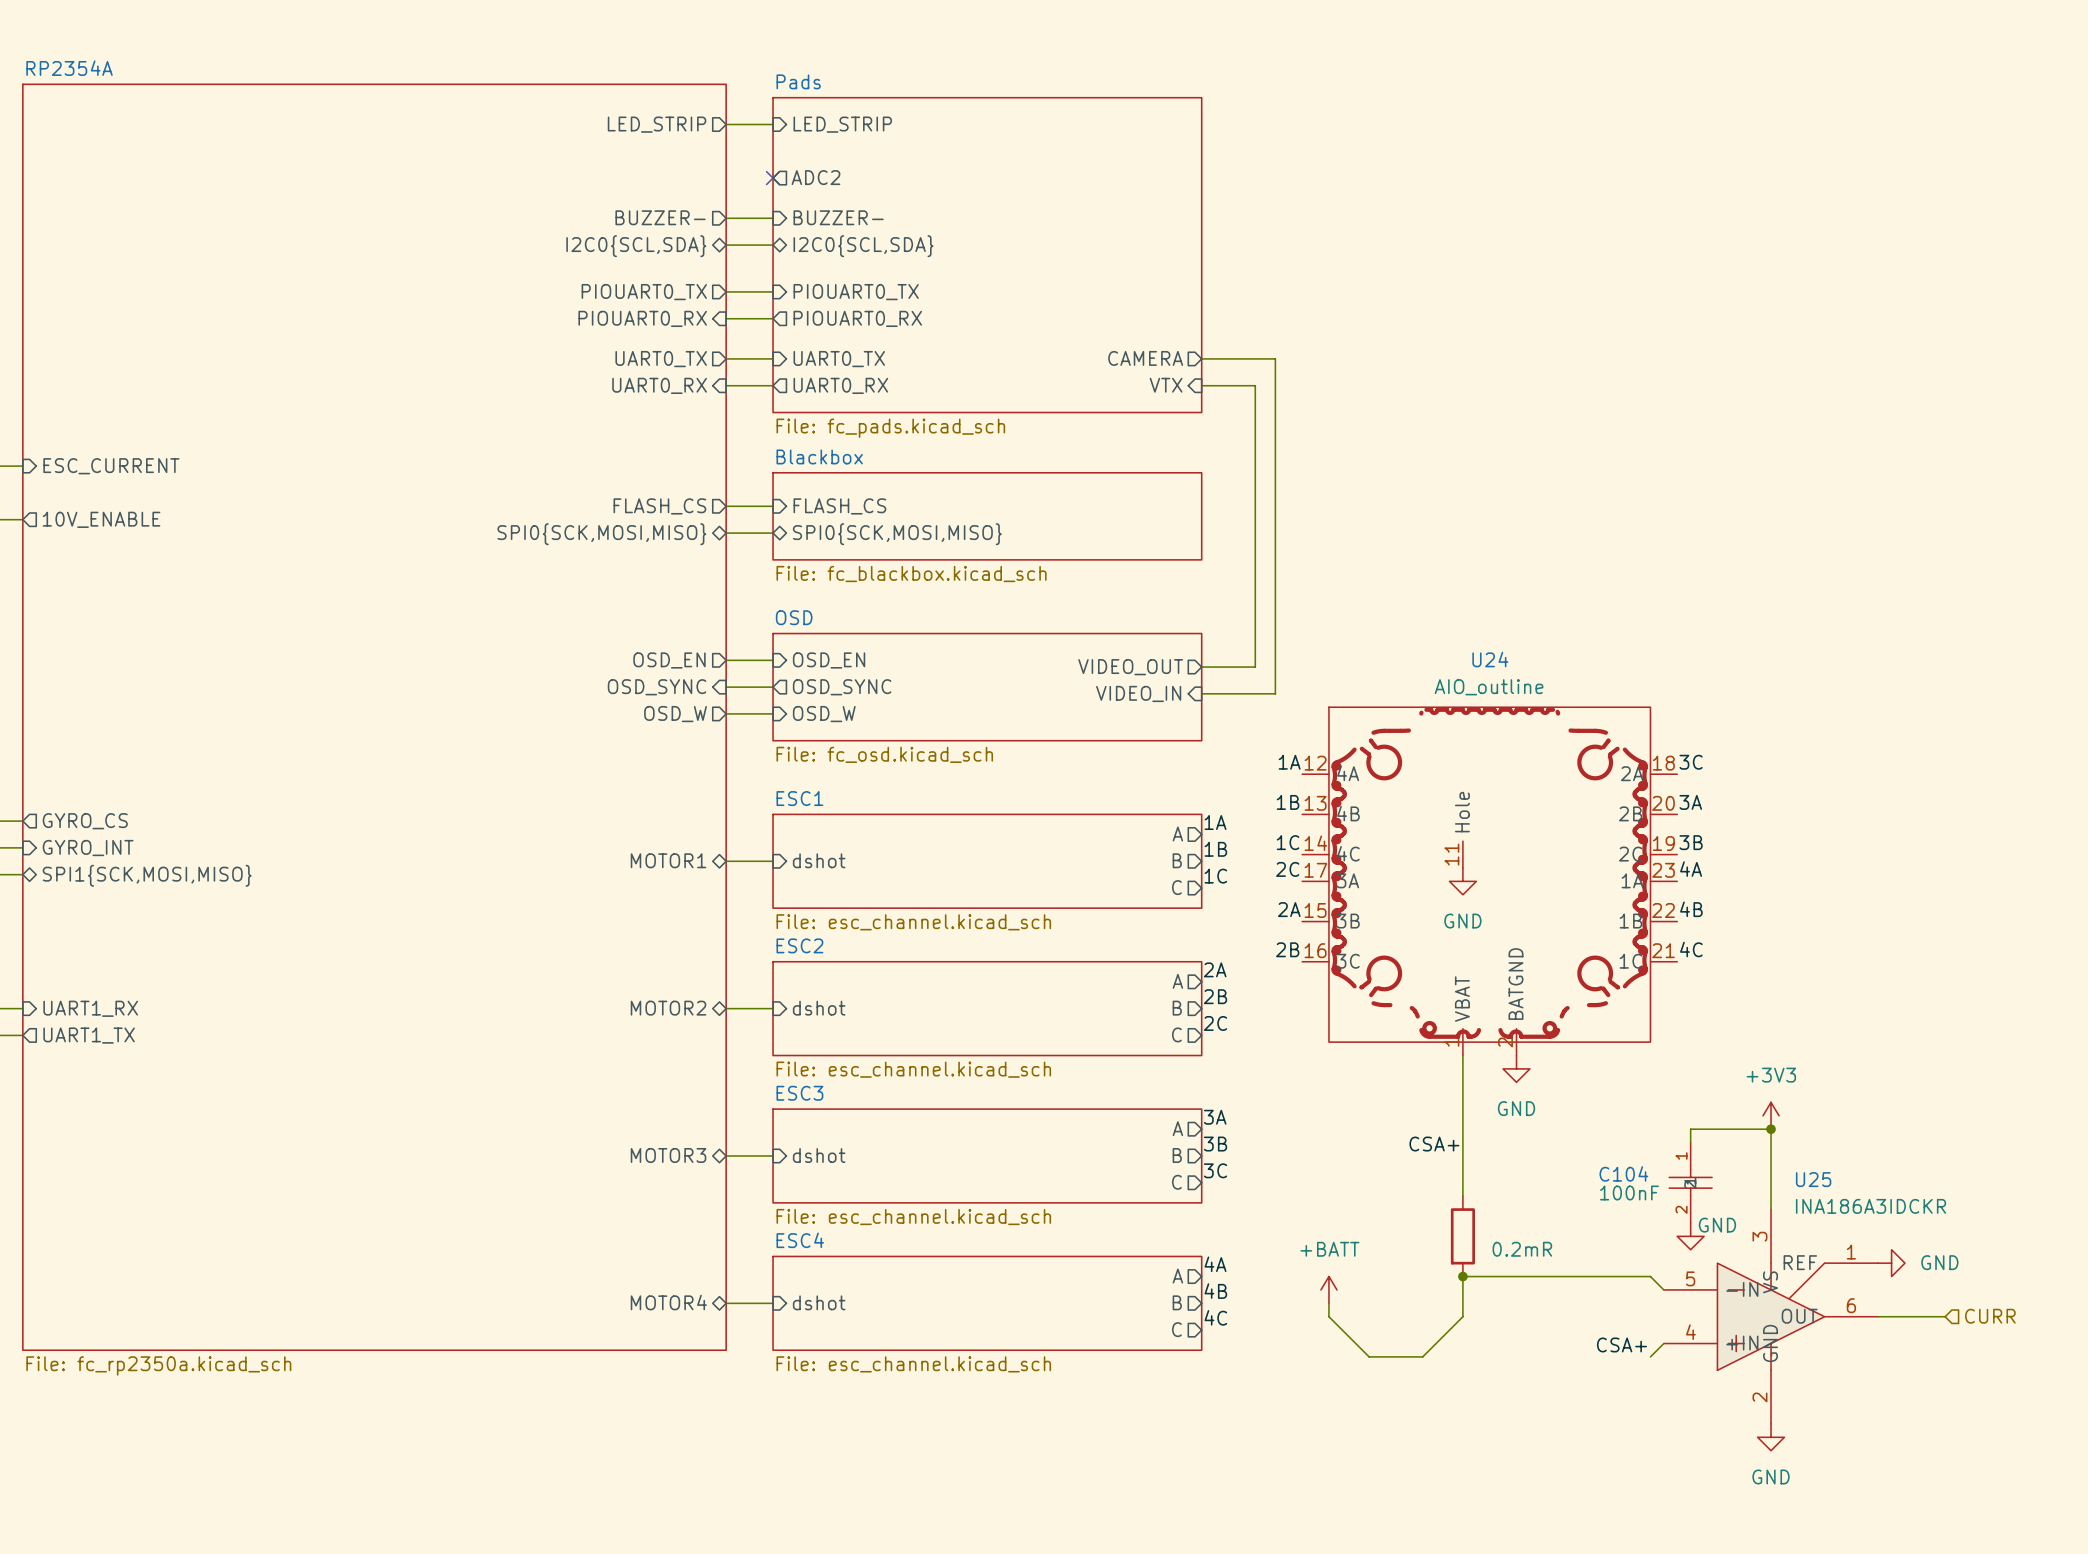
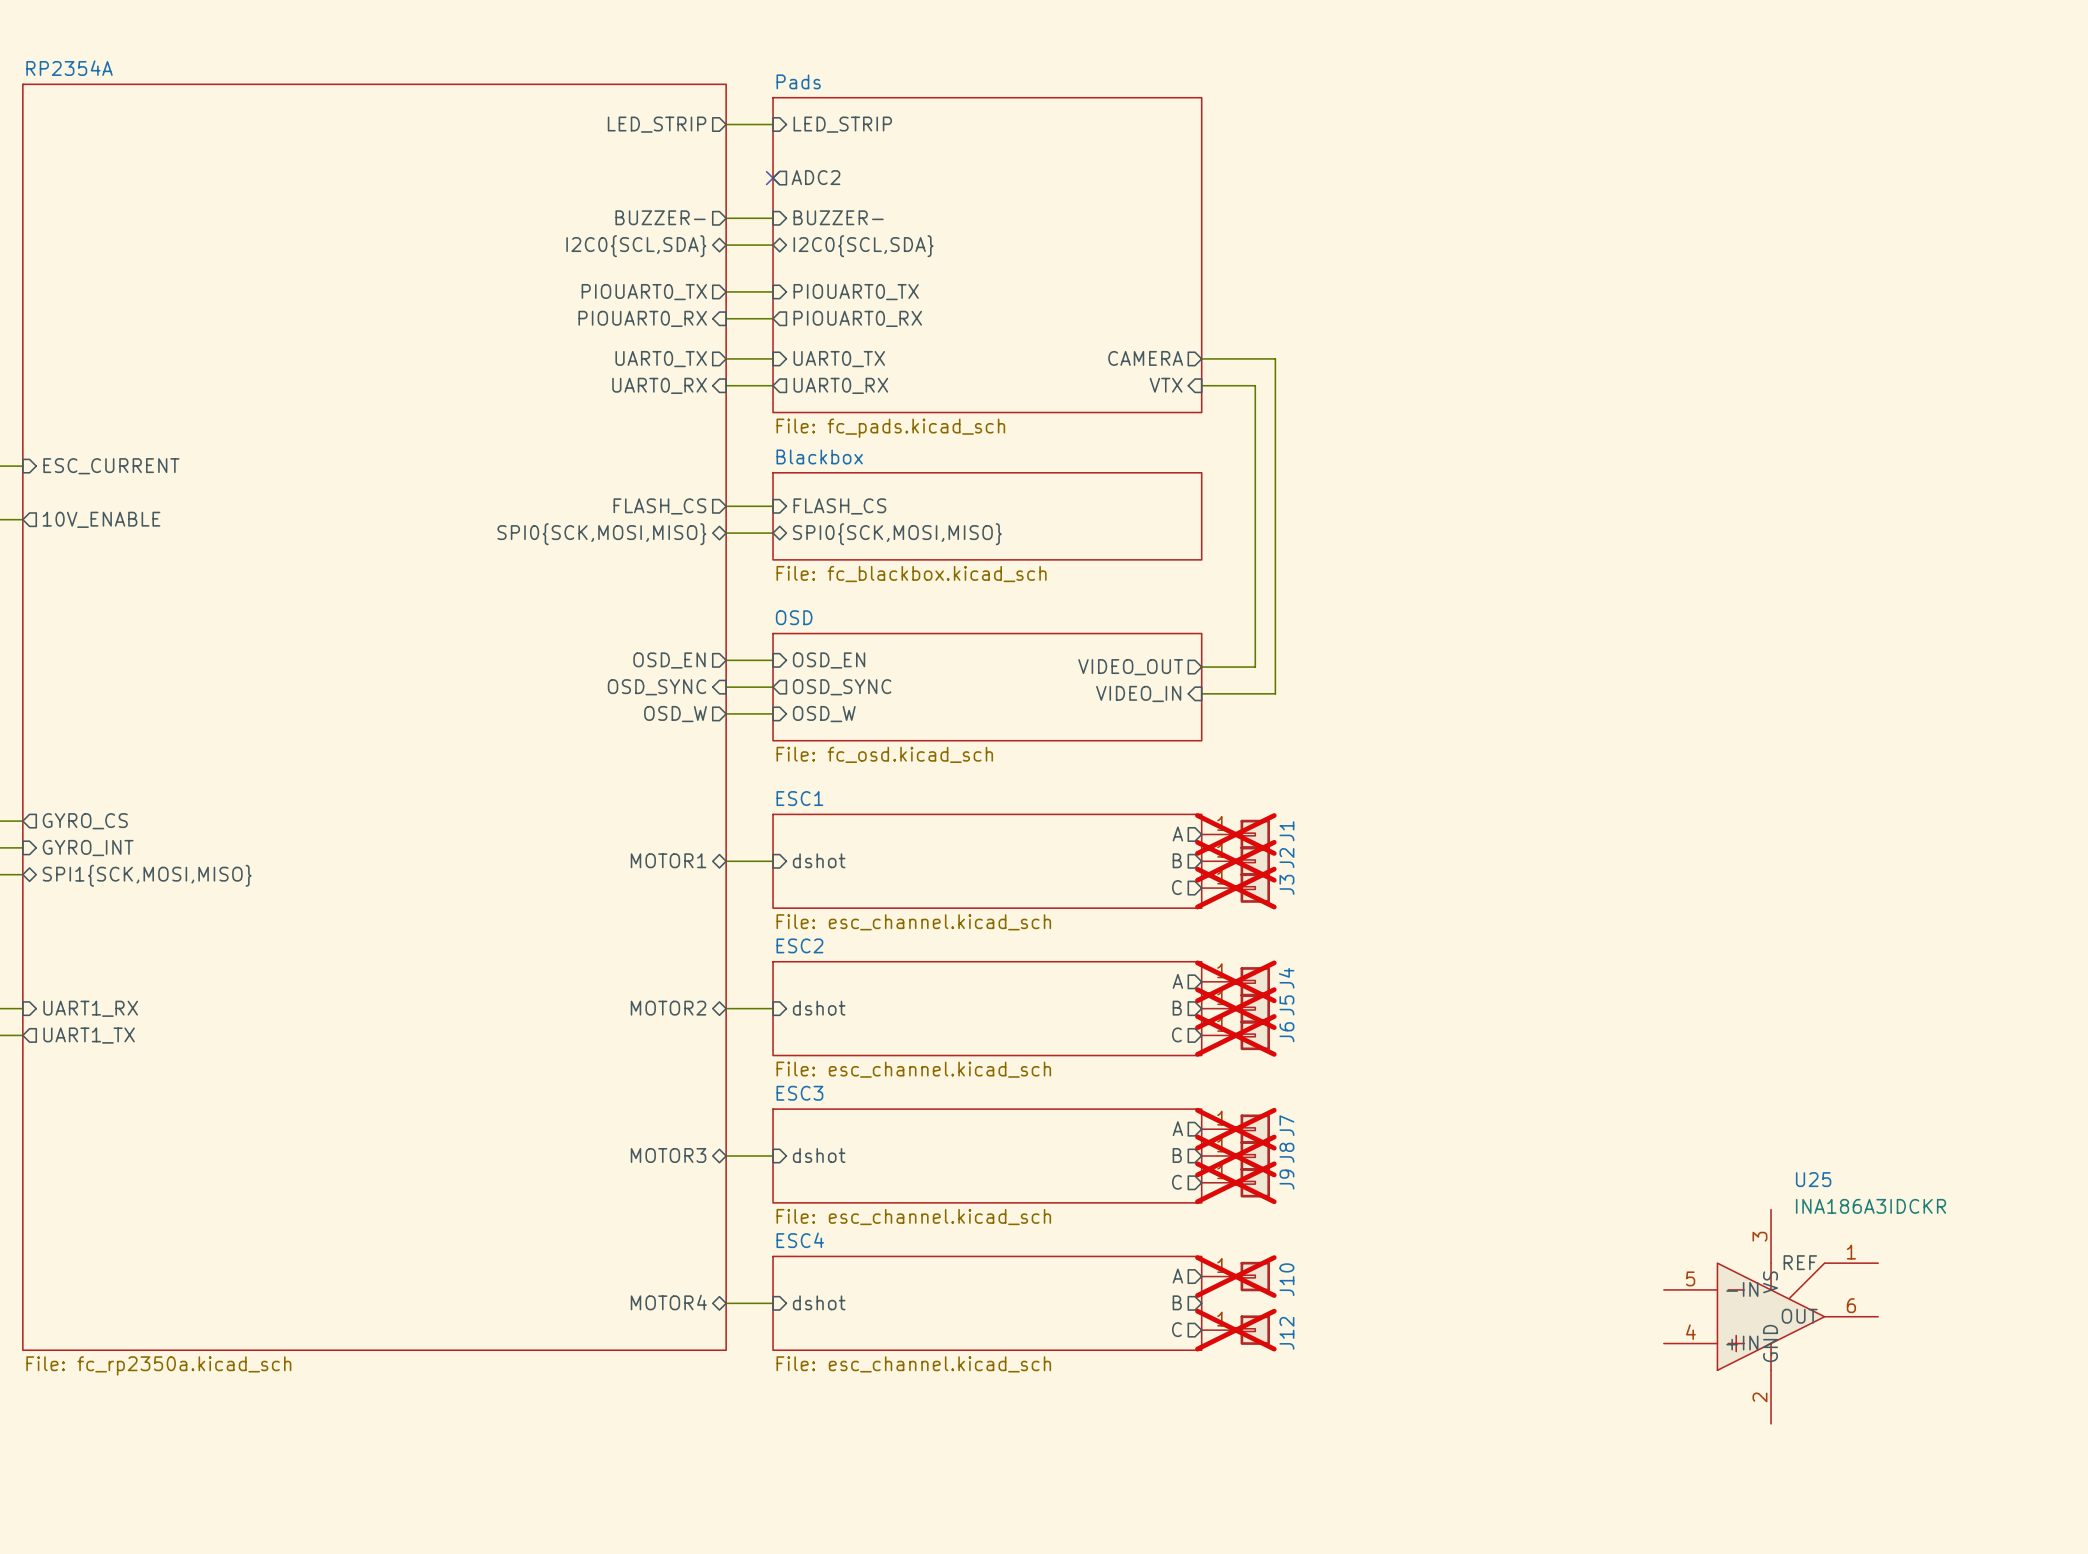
label: 1A (1289, 762) -> none
label: 3C (1691, 762) -> none
label: 1B (1288, 802) -> none
label: 3A (1690, 802) -> none
label: 1A (1215, 822) -> none
J1: none -> (1235, 834)
label: 1C (1288, 842) -> none
label: 3B (1691, 842) -> none
label: 1B (1215, 849) -> none
J2: none -> (1235, 861)
label: 2C (1287, 869) -> none
label: 4A (1691, 869) -> none
label: 1C (1215, 876) -> none
power symbol: GND (1462, 881) -> none
U24: AIO_outline (1489, 881) -> none
J3: none -> (1235, 888)
label: 2A (1289, 909) -> none
label: 4B (1691, 909) -> none
label: 2B (1287, 949) -> none
label: 4C (1691, 949) -> none
label: 2A (1215, 969) -> none
J4: none -> (1235, 981)
label: 2B (1215, 996) -> none
J5: none -> (1235, 1008)
label: 2C (1215, 1023) -> none
J6: none -> (1235, 1035)
wire: (1462, 1055) (1462, 1196) -> none
power symbol: GND (1516, 1068) -> none
power symbol: +3V3 (1771, 1115) -> none
label: 3A (1215, 1117) -> none
J7: none -> (1235, 1129)
junction: (1771, 1129) -> none
wire: (1690, 1142) (1690, 1129) (1771, 1129) (1771, 1209) -> none
label: 3B (1215, 1144) -> none
label: CSA+ (1434, 1144) -> none
J8: none -> (1235, 1155)
label: 3C (1215, 1170) -> none
J9: none -> (1235, 1182)
C104: 100nF (1690, 1182) -> none
part: 0.2mR (1462, 1236) -> none
power symbol: GND (1690, 1236) -> none
power symbol: GND (1891, 1263) -> none
label: 4A (1215, 1264) -> none
J10: none -> (1235, 1276)
junction: (1462, 1276) -> none
power symbol: +BATT (1328, 1289) -> none
wire: (1663, 1289) (1650, 1276) (1462, 1276) (1462, 1316) (1422, 1356) (1369, 1356) (1328, 1316) (1328, 1303) -> none
label: 4B (1215, 1291) -> none
wire: (1878, 1316) (1945, 1316) -> none
hierarchical label: CURR (1990, 1316) -> none
label: 4C (1215, 1317) -> none
J12: none -> (1235, 1330)
wire: (1663, 1343) (1650, 1356) -> none
label: CSA+ (1621, 1344) -> none
power symbol: GND (1771, 1437) -> none

